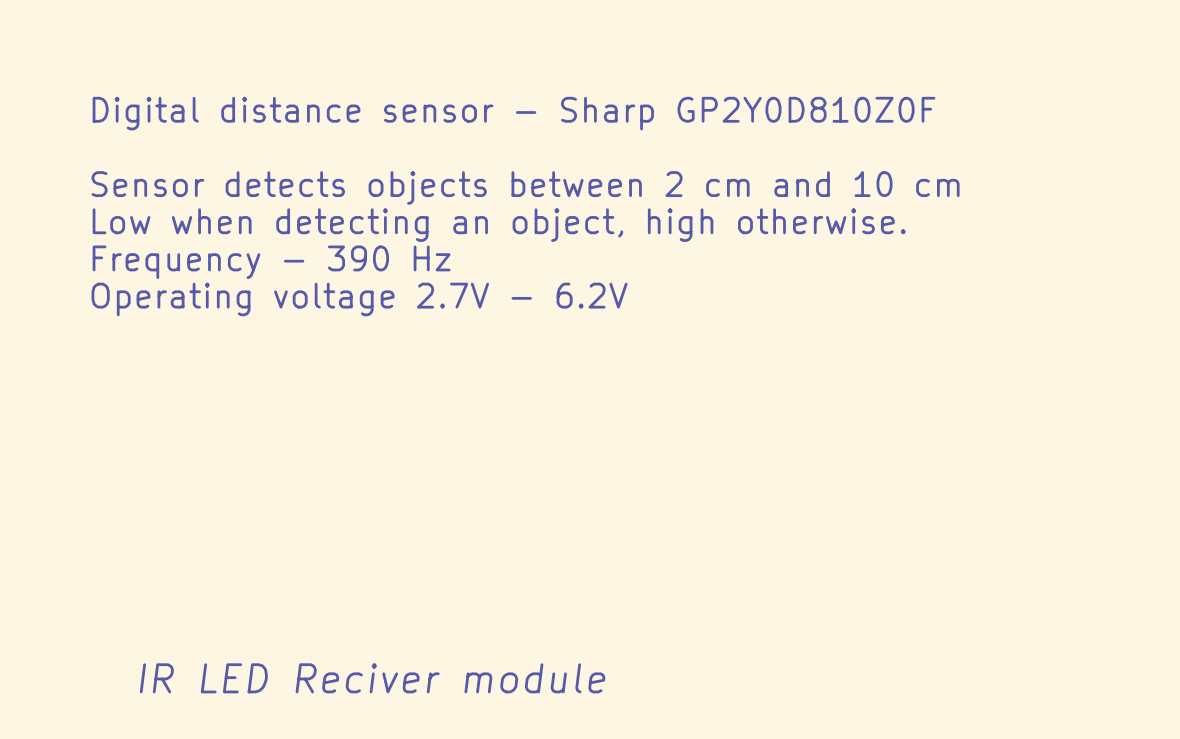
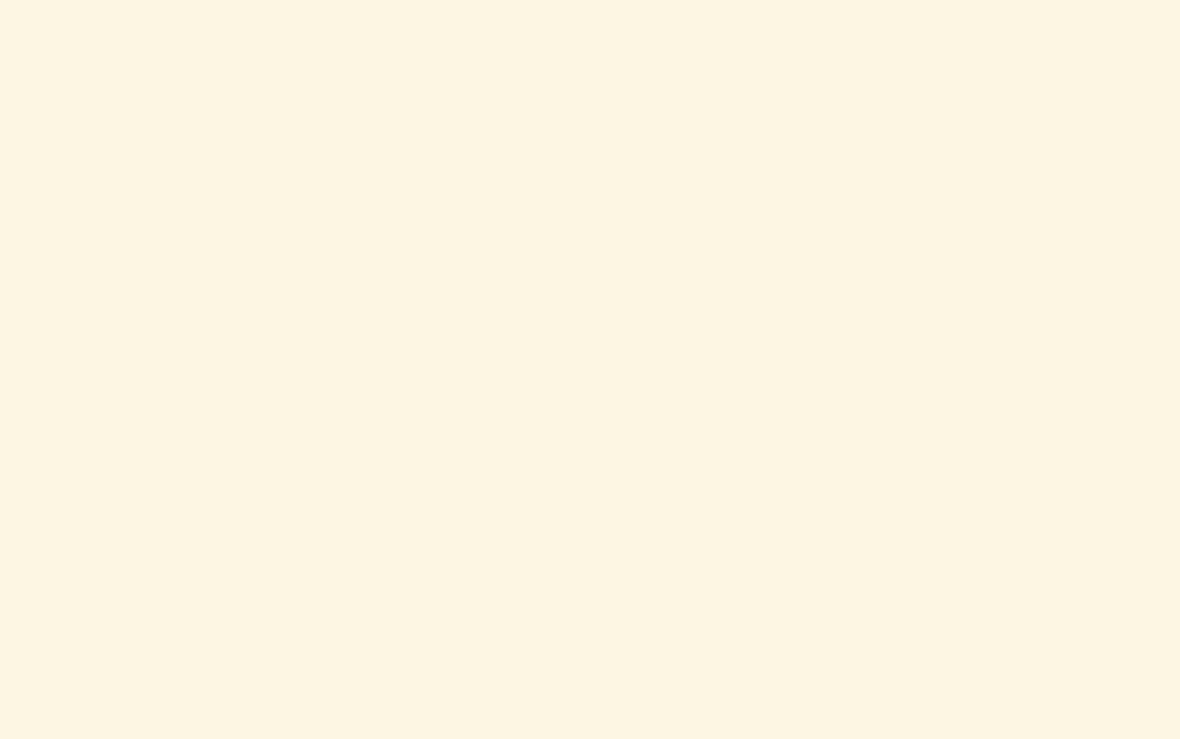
text: Digital distance sensor - Sharp GP2Y0D810Z0F (514, 113) -> none
text: Sensor detects objects between 2 cm and 10 cm (525, 187) -> none
text: Low when detecting an object, high otherwise. (499, 225) -> none
text: Frequency - 390 Hz (271, 262) -> none
text: Operating voltage 2.7V - 6.2V (359, 299) -> none
text: IR LED Reciver module (372, 678) -> none

